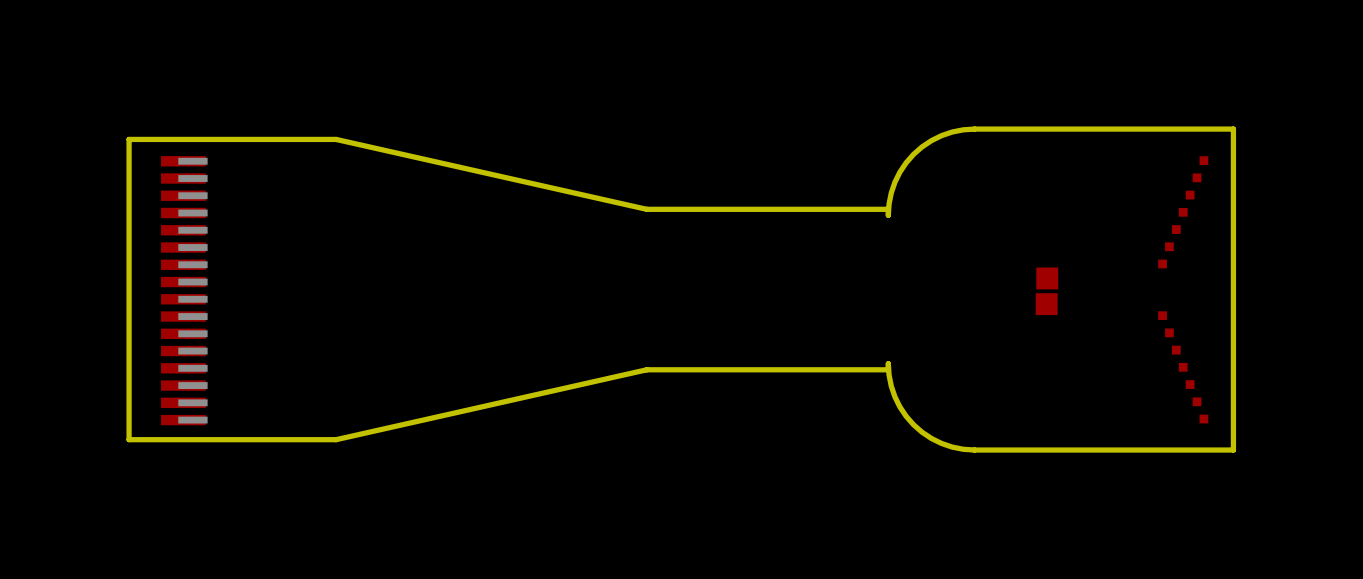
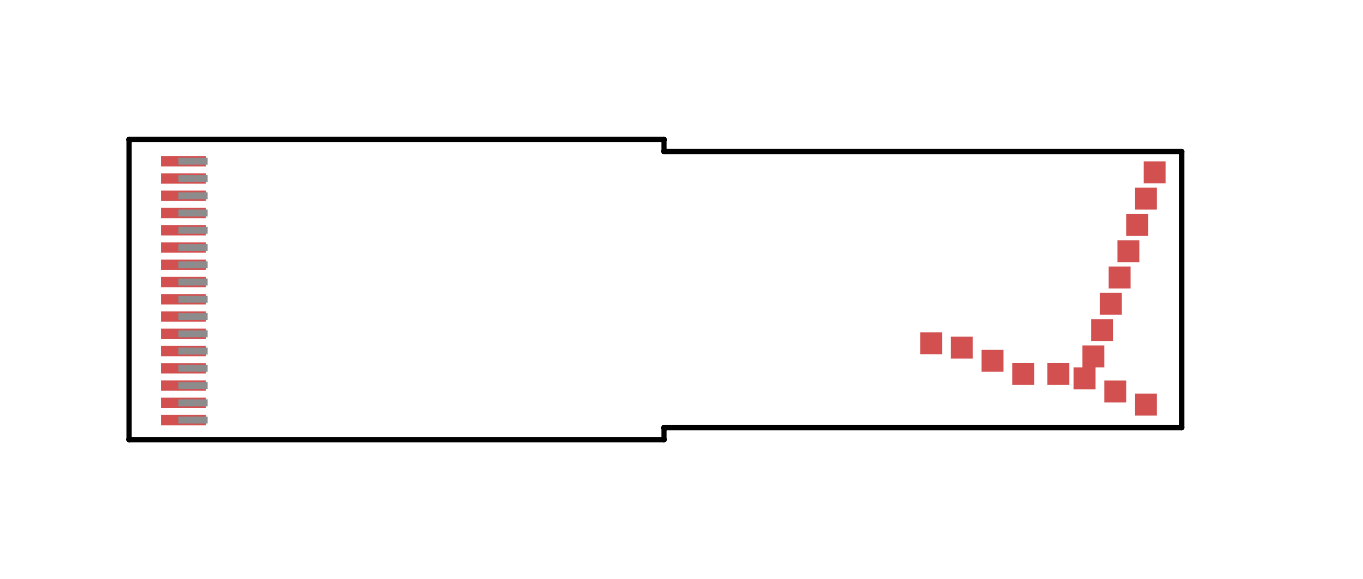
board edge: (336, 139) (646, 209) (888, 209) (888, 215) (894, 182) (906, 162) (931, 140) (952, 132) (974, 129) (1233, 129) (1233, 450) (974, 450) (952, 447) (931, 438) (906, 416) (894, 396) (888, 363) (888, 369) (646, 369) (336, 439) -> (336, 139) (664, 139) (664, 151) (1181, 151) (1181, 427) (664, 427) (664, 439) (336, 439)
part: (1203, 160) -> none
part: none -> (1154, 172)
part: (1197, 177) -> none
part: (1190, 195) -> none
part: none -> (1145, 198)
part: (1183, 212) -> none
part: none -> (1137, 224)
part: (1176, 229) -> none
part: (1169, 246) -> none
part: none -> (1128, 251)
part: (1162, 263) -> none
part: none -> (1119, 277)
part: (1047, 278) -> none
part: none -> (1110, 303)
part: (1046, 304) -> none
part: (1162, 315) -> none
part: none -> (1102, 330)
part: (1169, 332) -> none
part: none -> (931, 343)
part: none -> (961, 347)
part: (1176, 350) -> none
part: none -> (1093, 356)
part: none -> (992, 360)
part: (1183, 367) -> none
part: none -> (1023, 373)
part: none -> (1058, 373)
part: none -> (1084, 378)
part: (1190, 384) -> none
part: none -> (1115, 391)
part: (1197, 401) -> none
part: none -> (1145, 404)
part: (1203, 419) -> none

